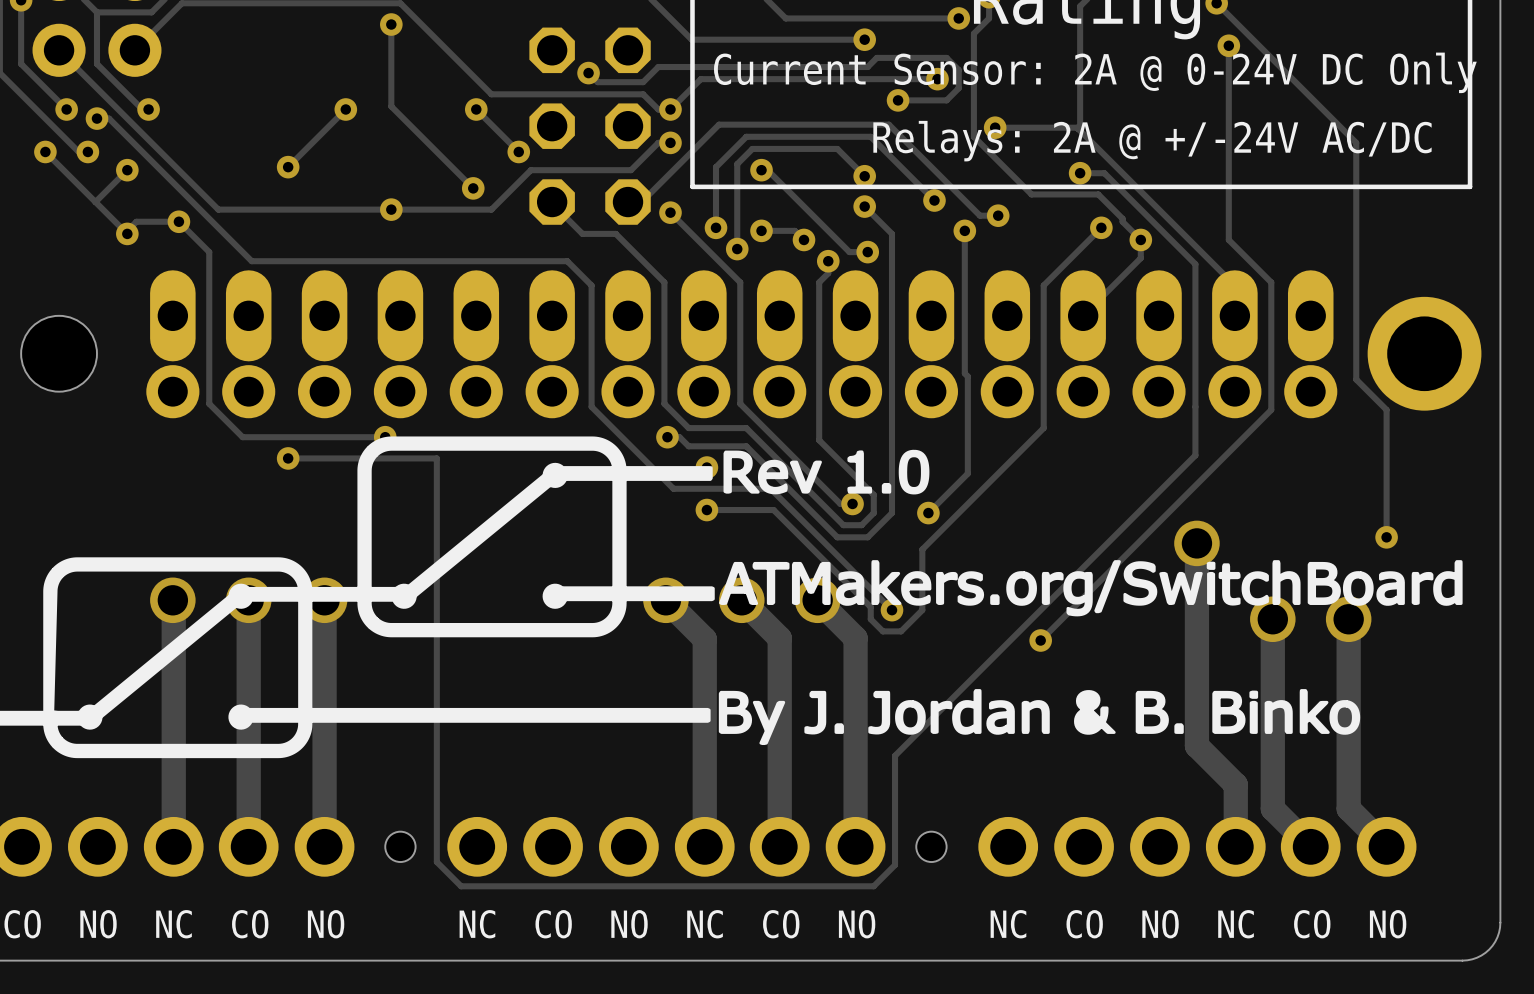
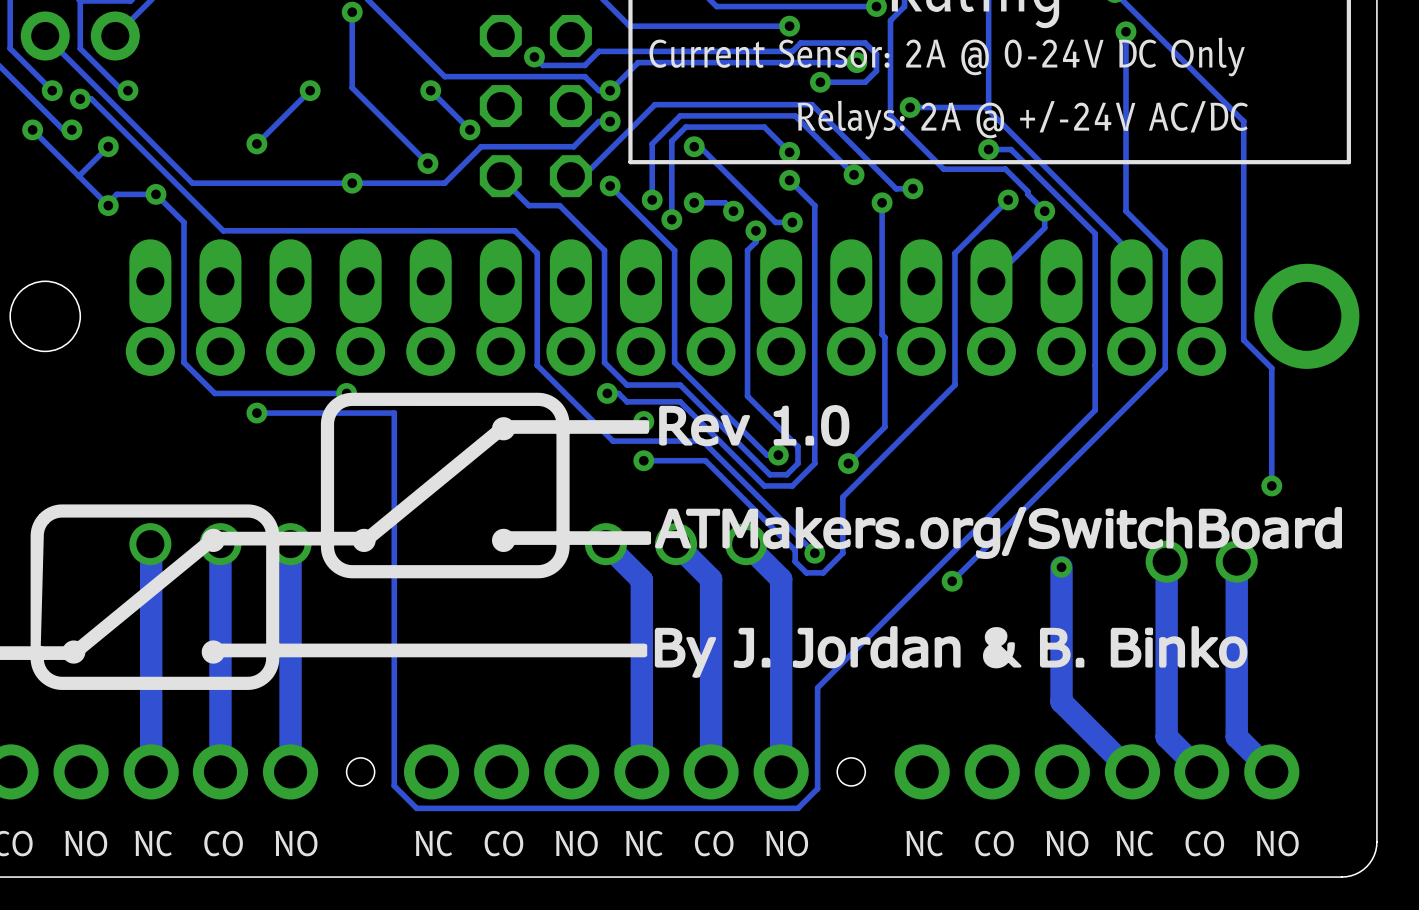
track: (1196, 543) (1196, 745) (1235, 784) (1235, 846) -> (1061, 567) (1061, 701) (1132, 771)
via: (1196, 543) -> none
via: none -> (1061, 567)

